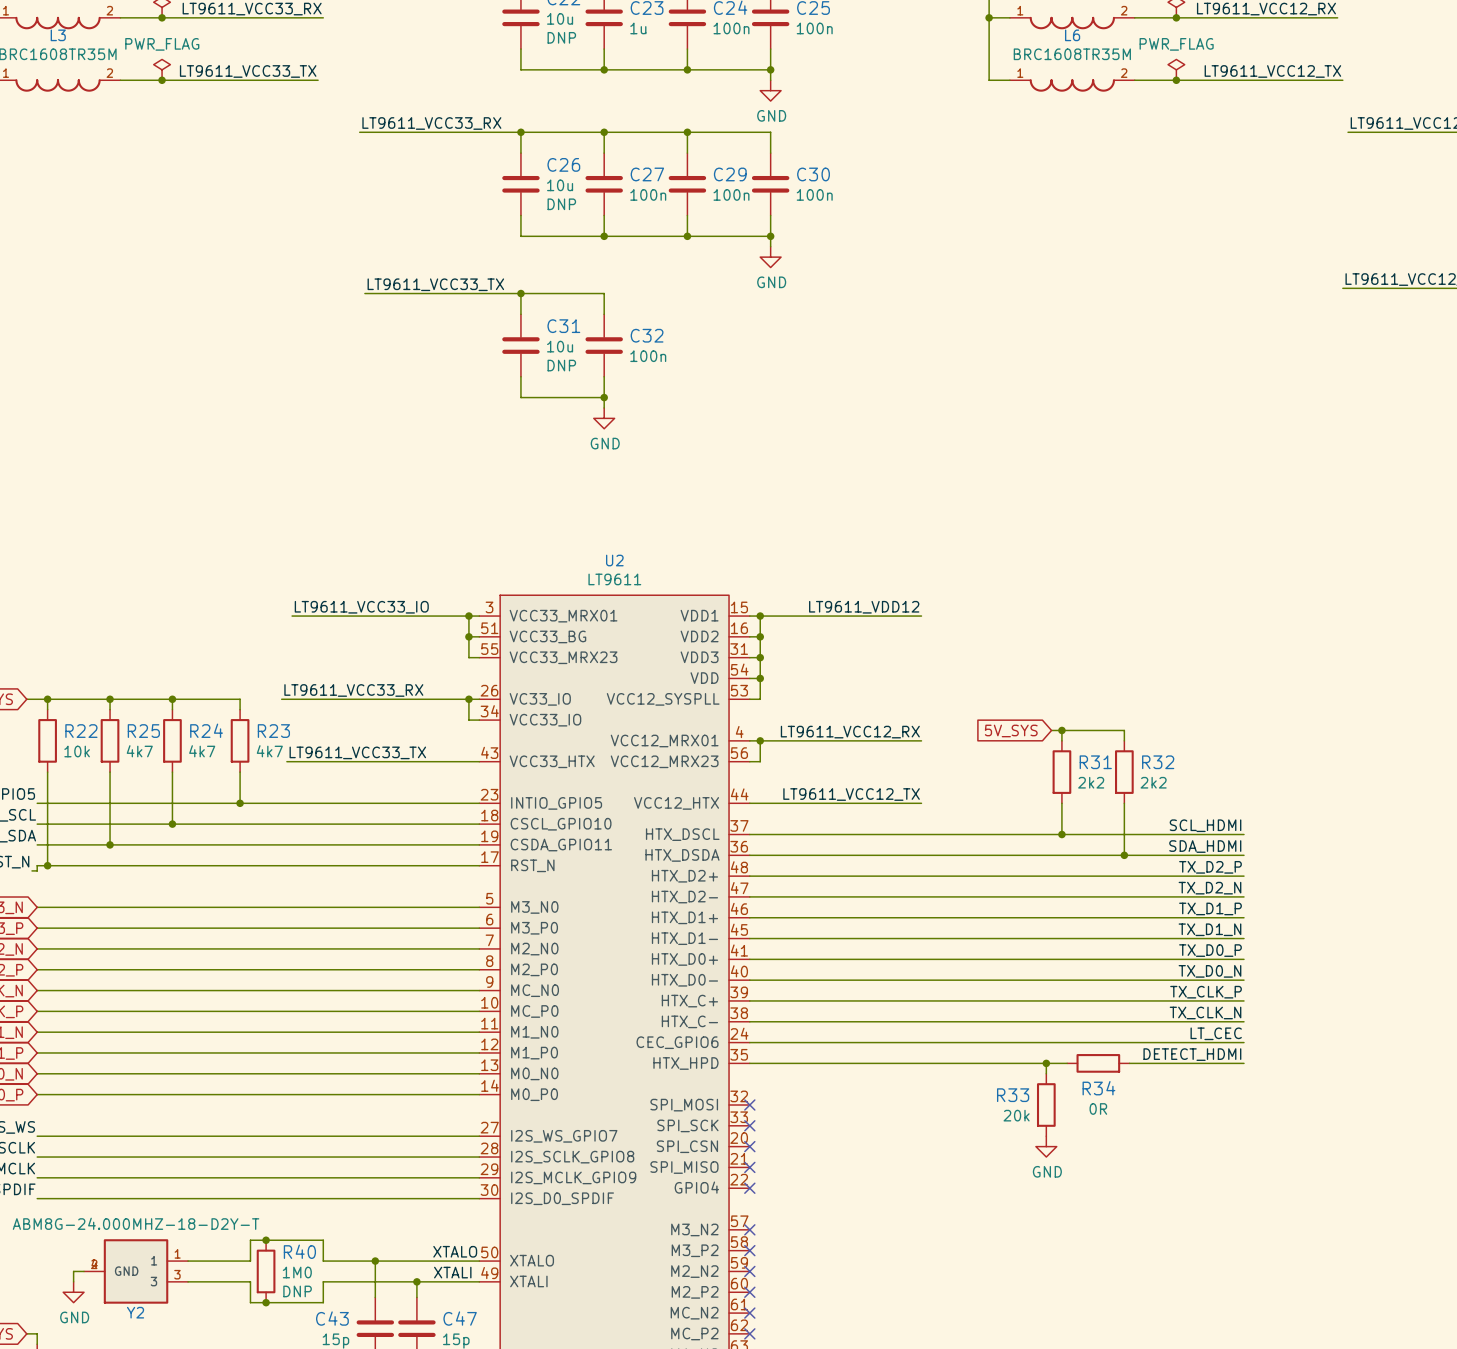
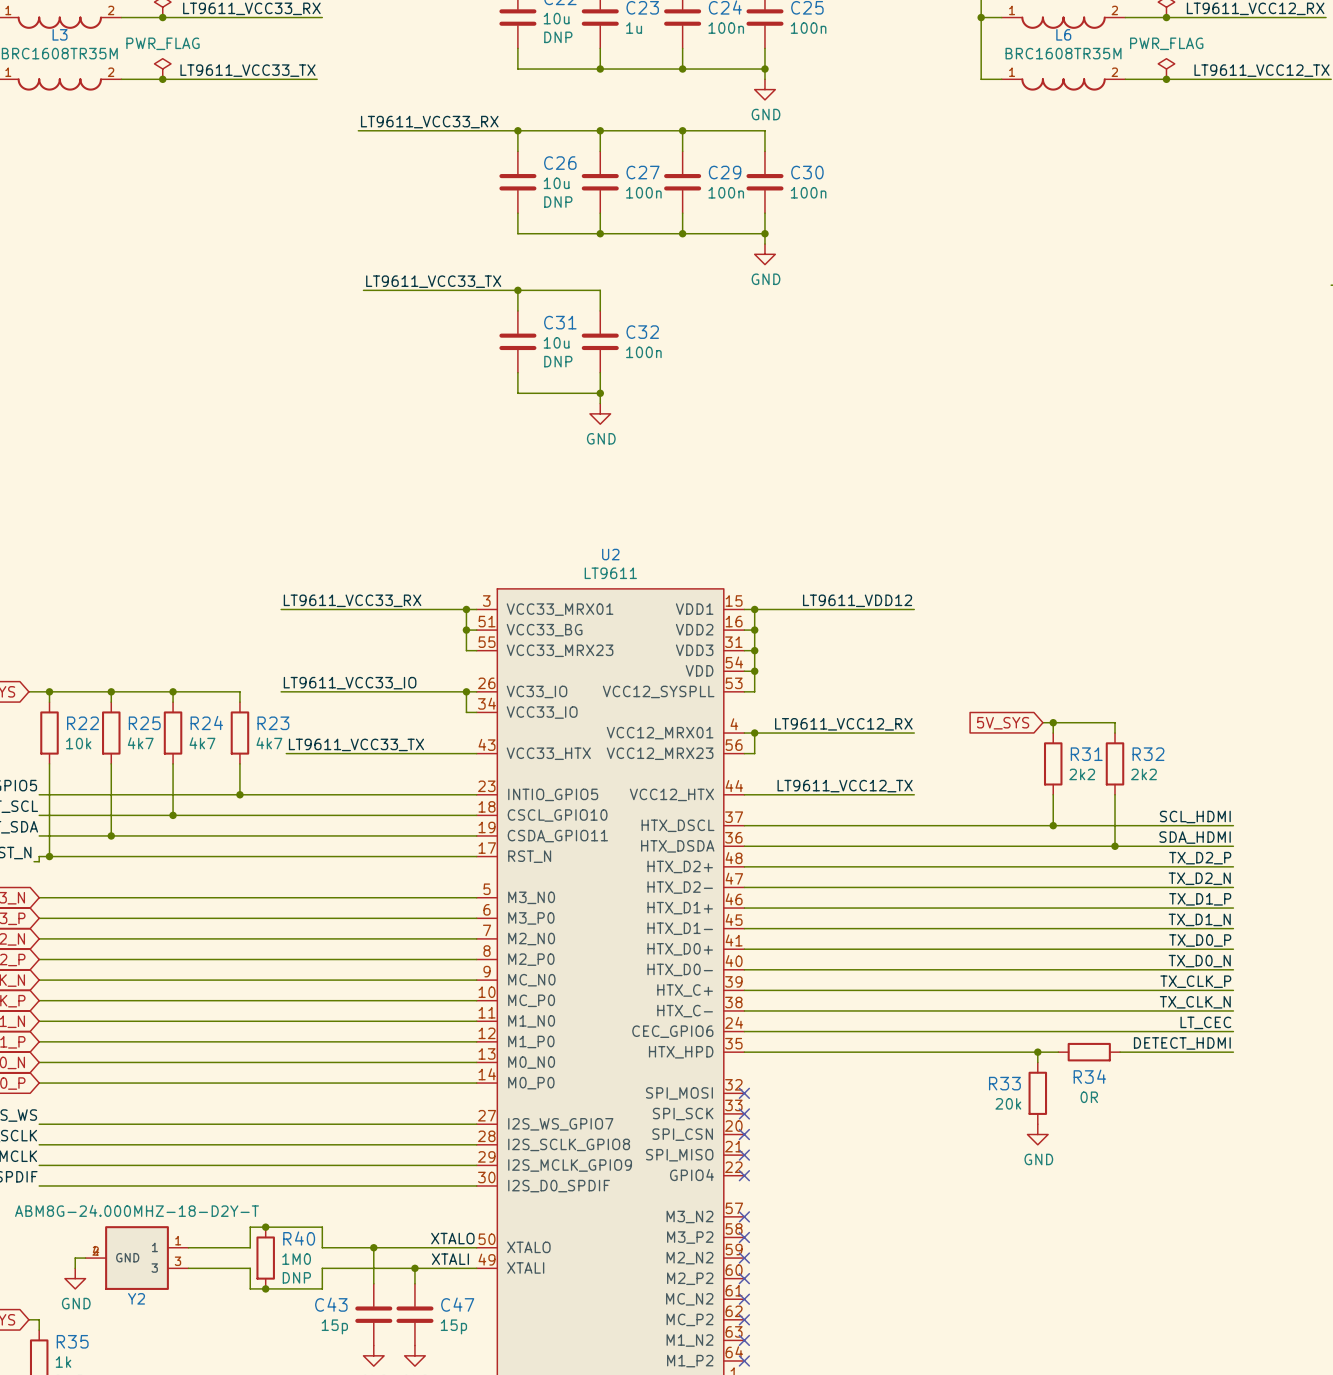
label: LT9611_VCC33_IO (361, 607) -> LT9611_VCC33_RX (352, 600)
wire: none -> (281, 609) (291, 609)
label: LT9611_VCC33_RX (353, 690) -> LT9611_VCC33_IO (350, 683)

